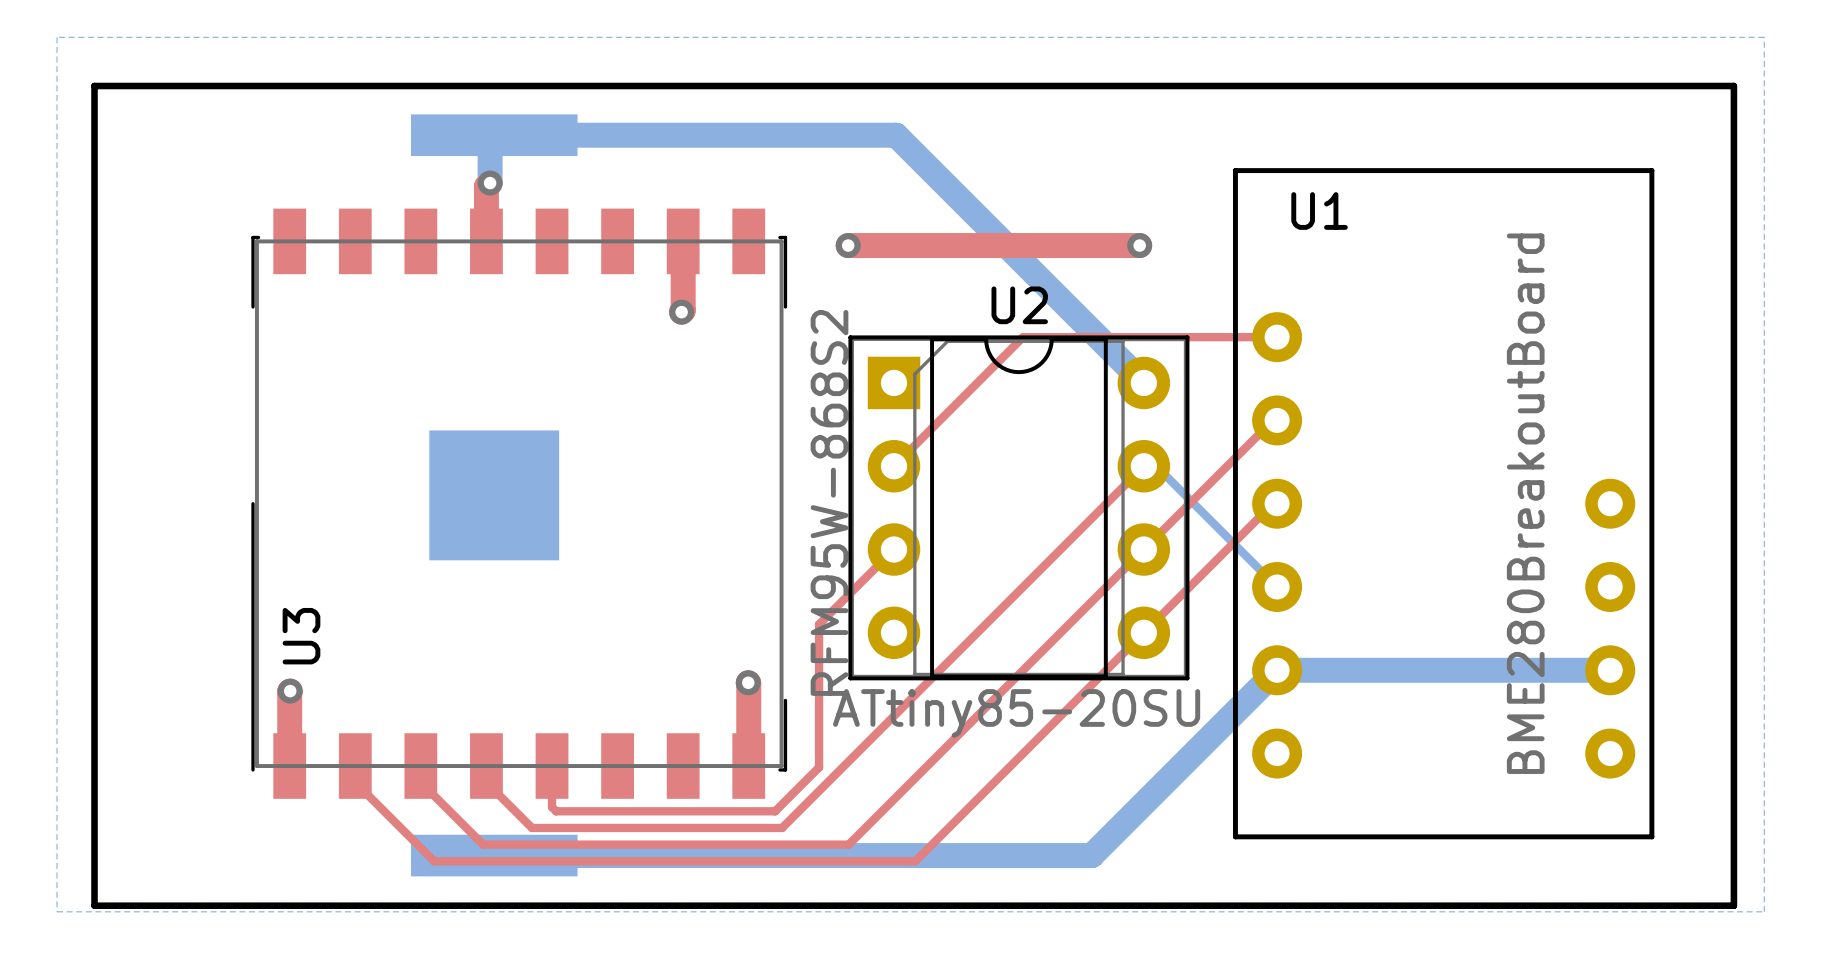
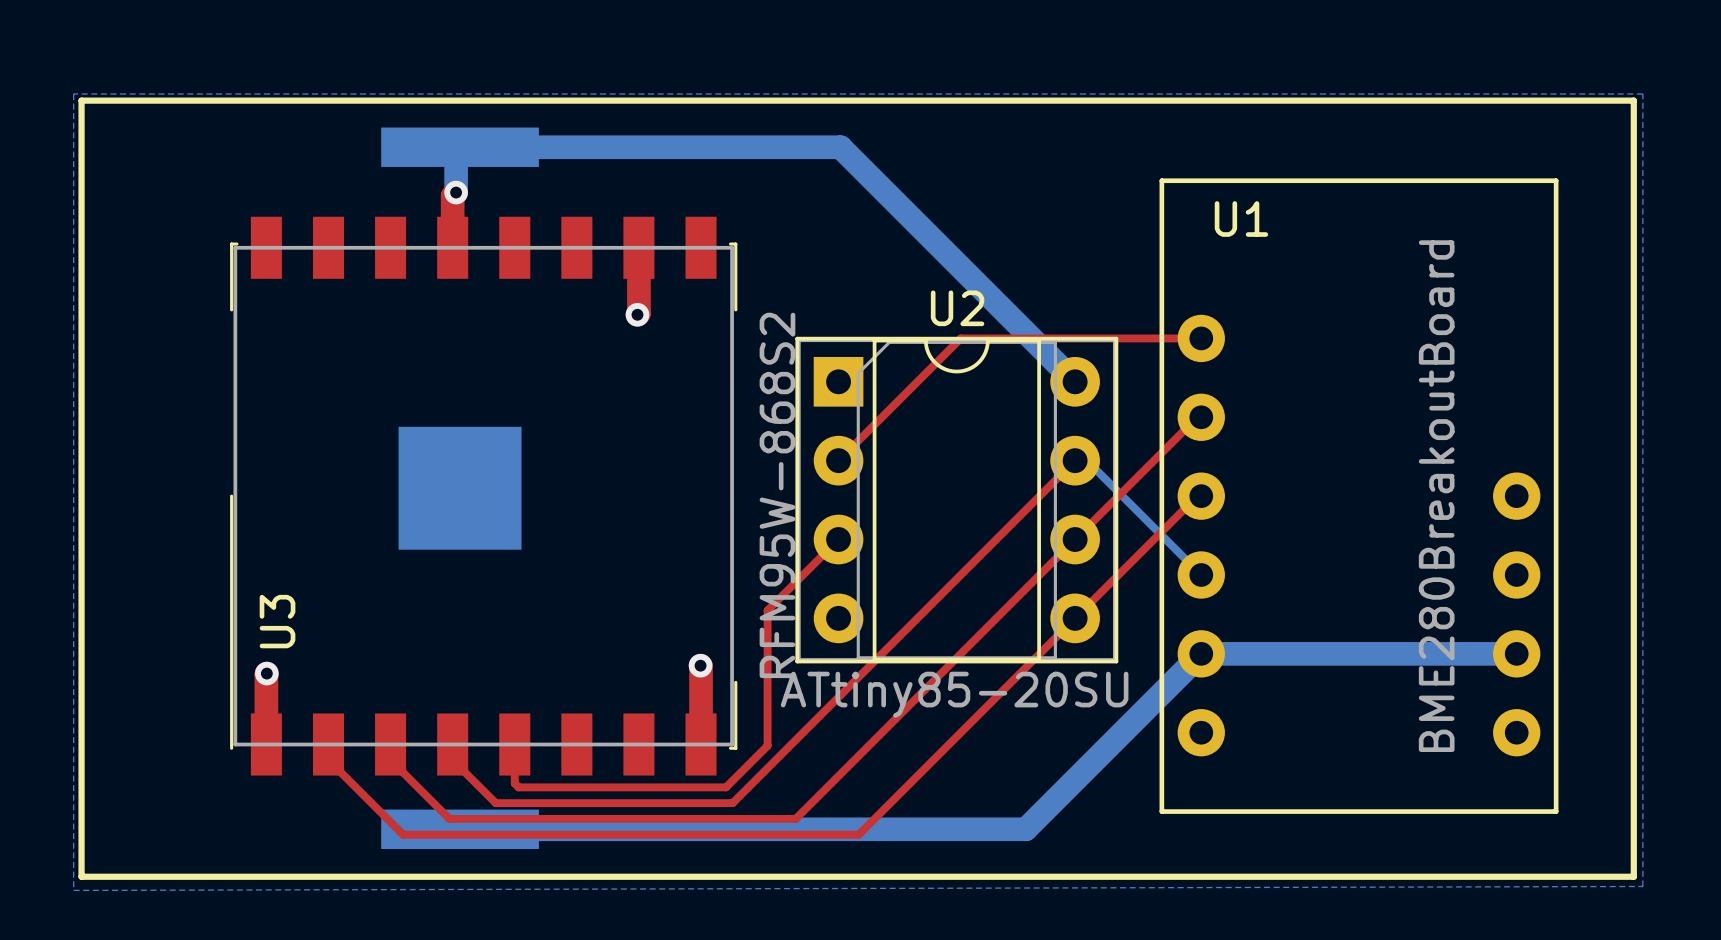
bottom zone outline: (57, 37) (1764, 37) (1764, 911) (57, 911) (57, 37) -> (73, 93) (73, 890) (1642, 886) (1642, 93) (73, 93)
board edge: (94, 85) (1733, 85) (1733, 905) (94, 905) (94, 85) -> none
line: none -> (81, 100) (1633, 100) (1633, 876) (81, 876) (81, 100)
top track: (848, 245) (1139, 245) -> none
via: (848, 245) -> none
via: (1139, 245) -> none

